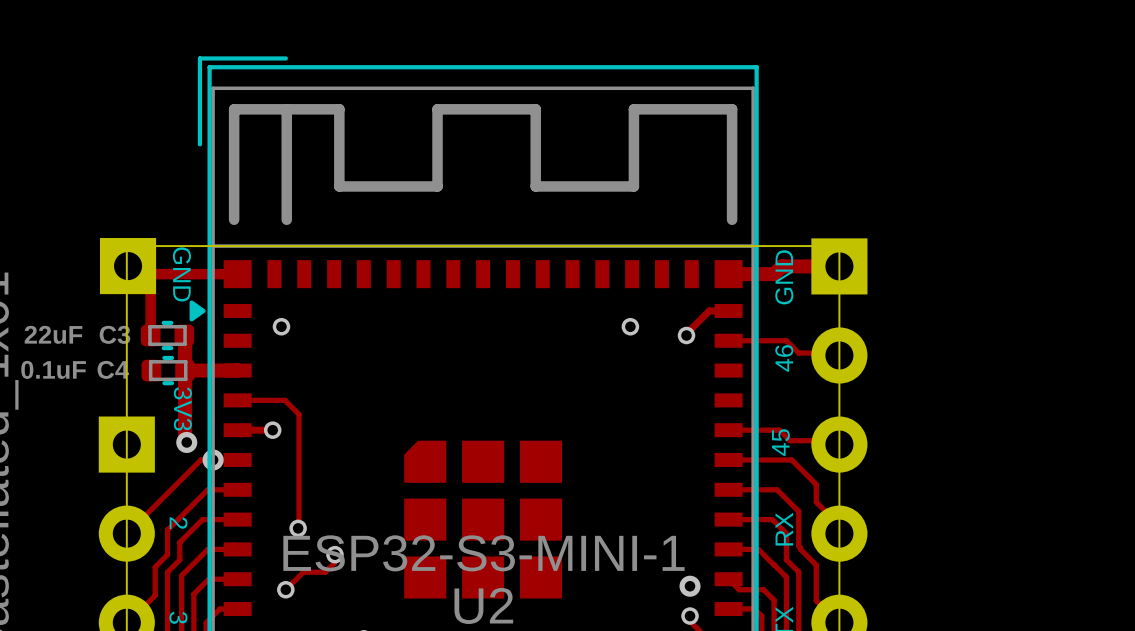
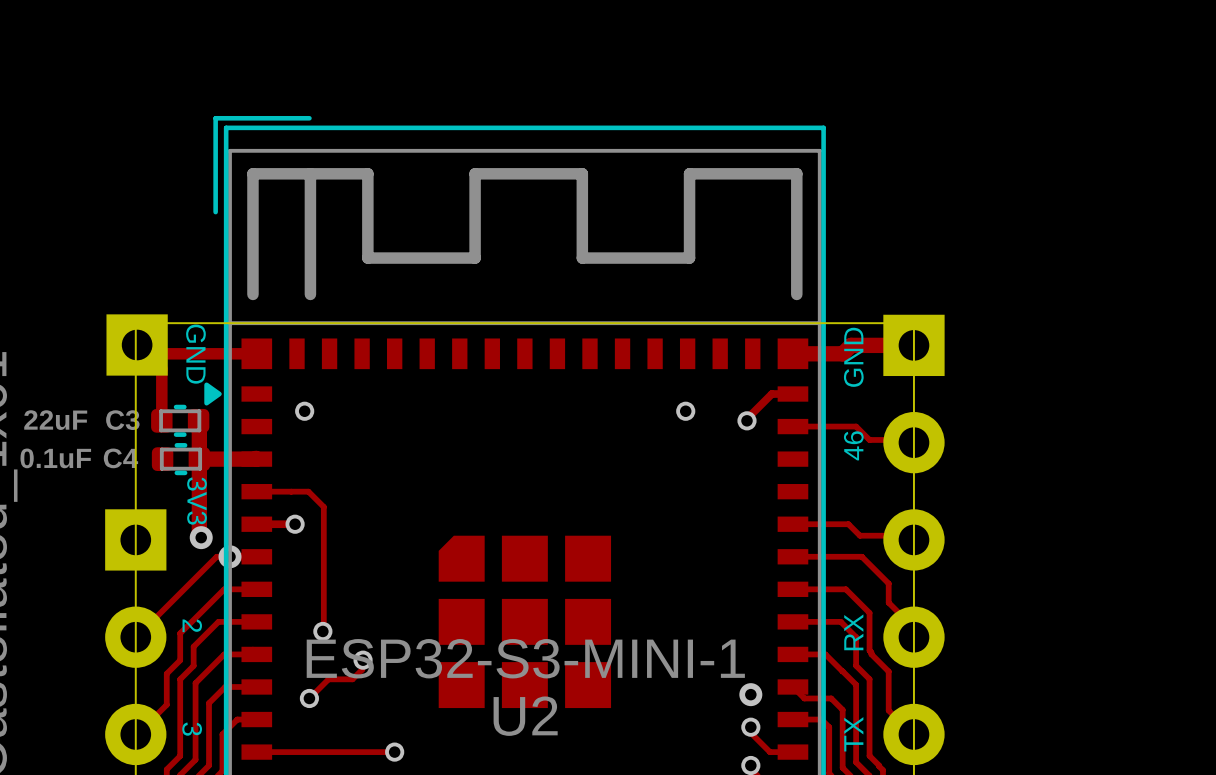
text: 45 (780, 442) -> none

